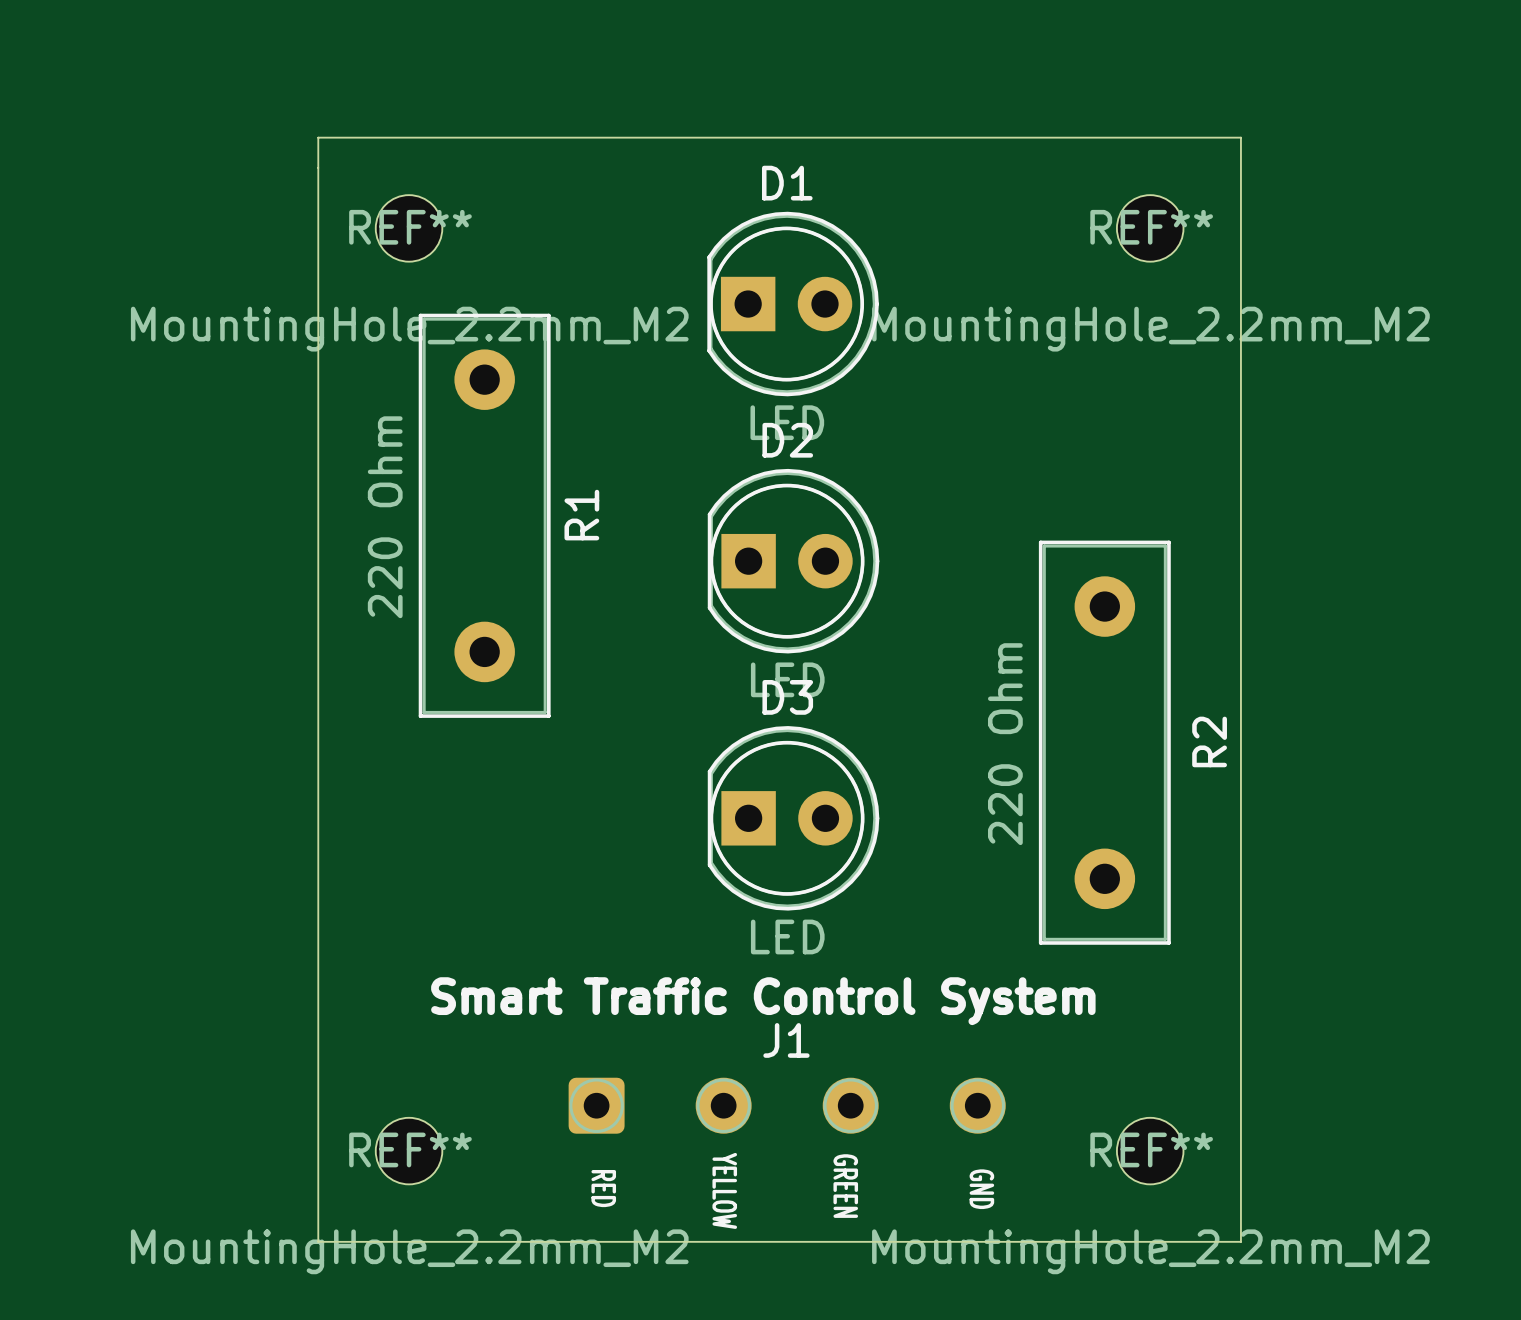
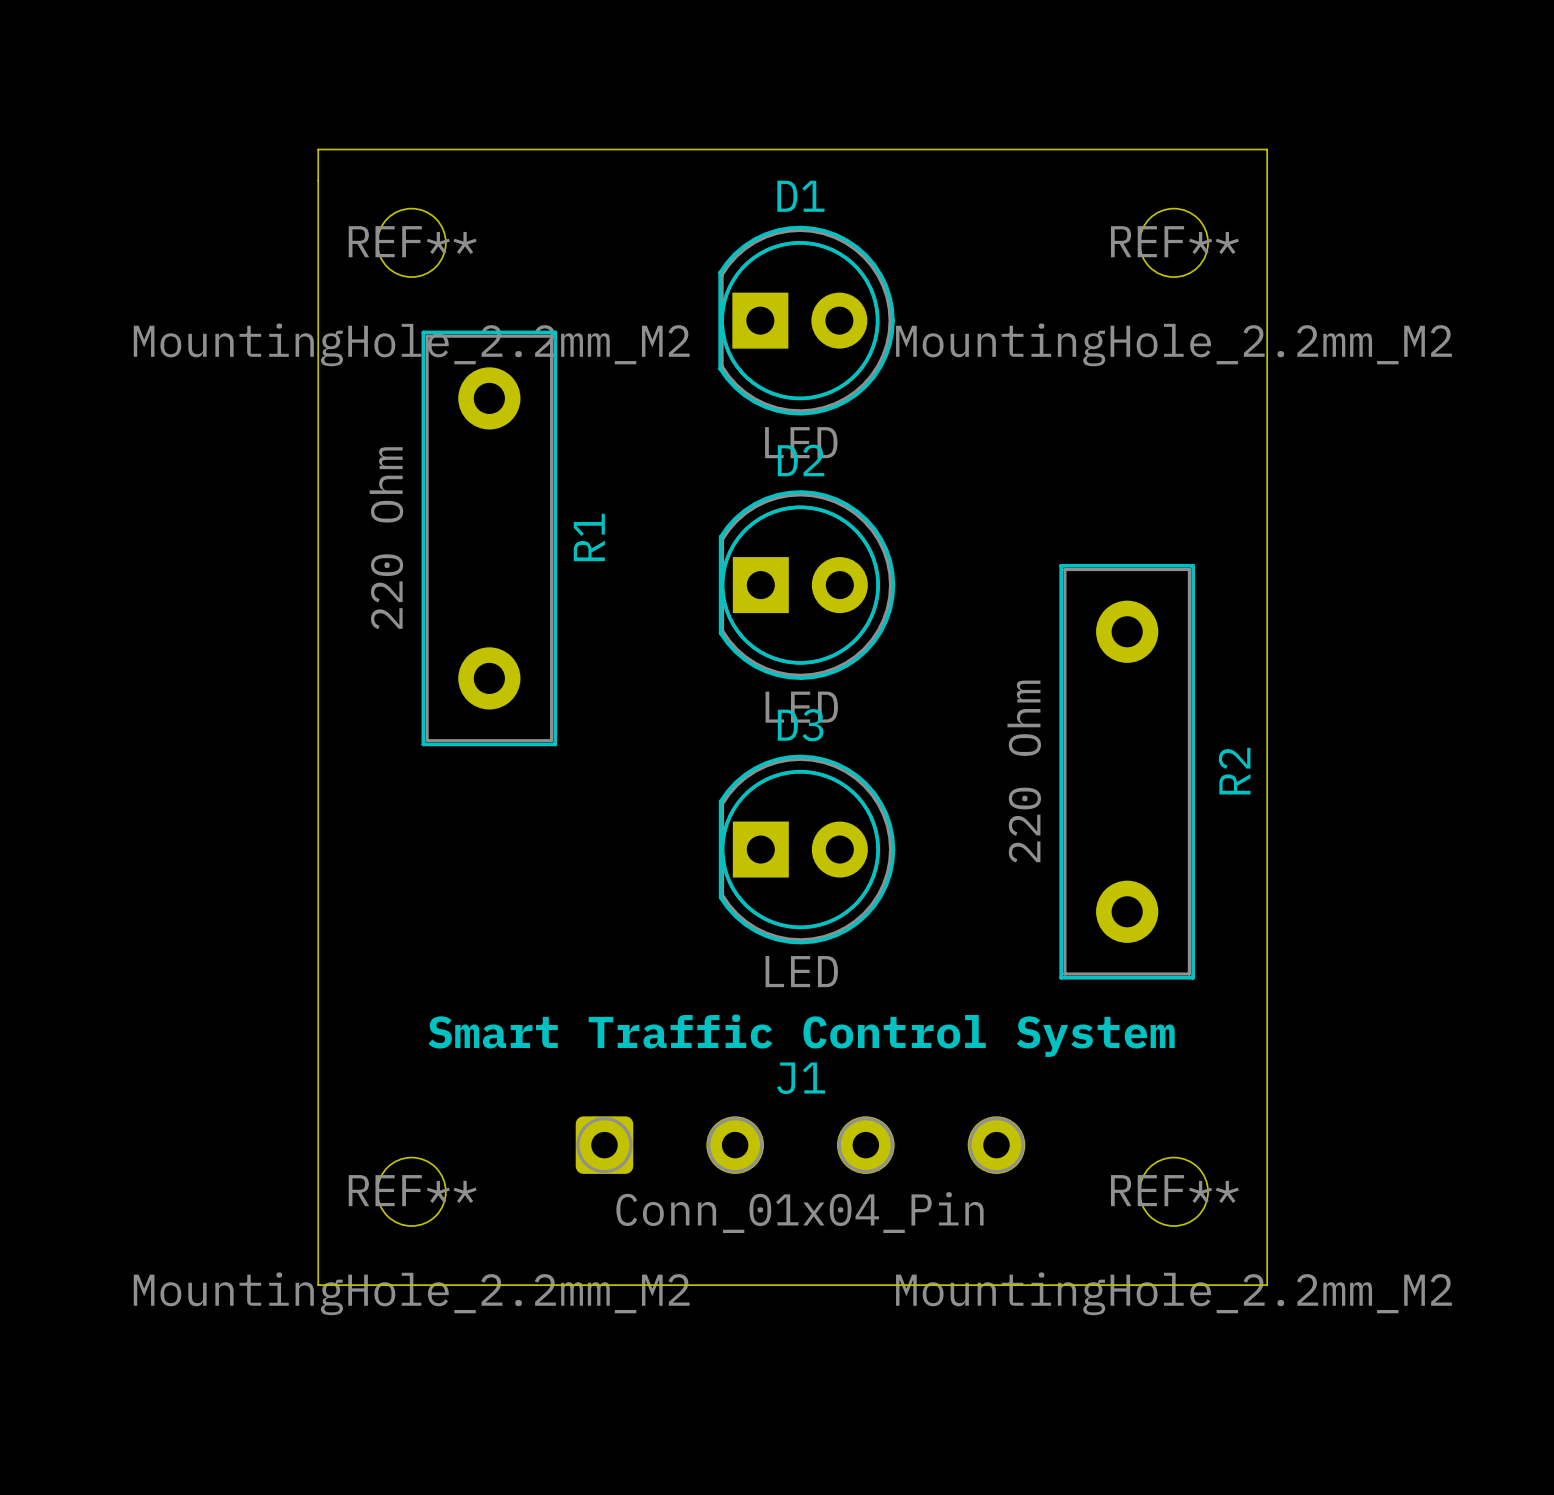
J1 value: none -> Conn_01x04_Pin (799, 1212)
text: GREEN (845, 1186) -> none
text: RED (603, 1188) -> none
text: GND (981, 1189) -> none
text: YELLOW (724, 1190) -> none

